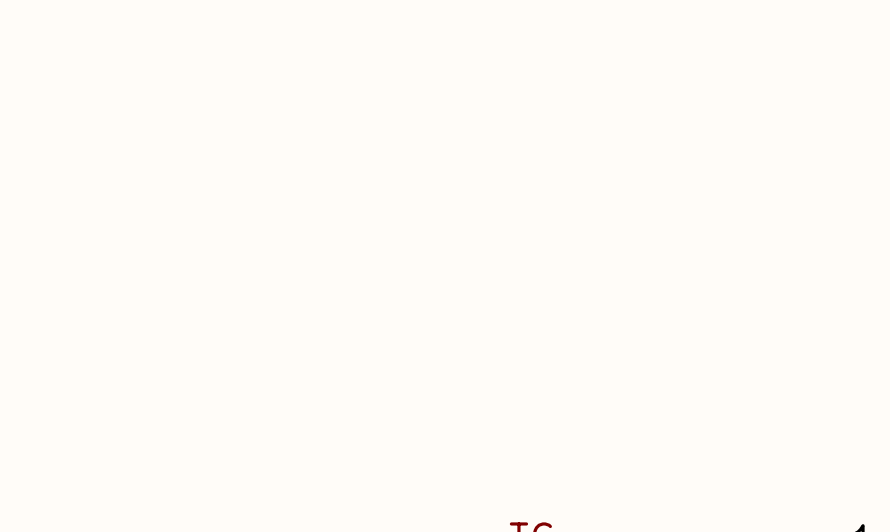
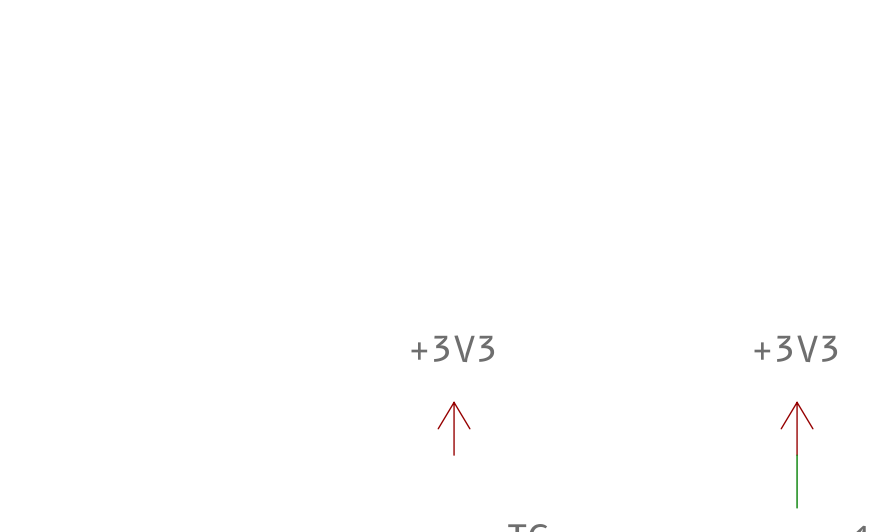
power symbol: none -> +3V3 (454, 428)
power symbol: none -> +3V3 (797, 428)
wire: none -> (797, 455) (797, 507)

